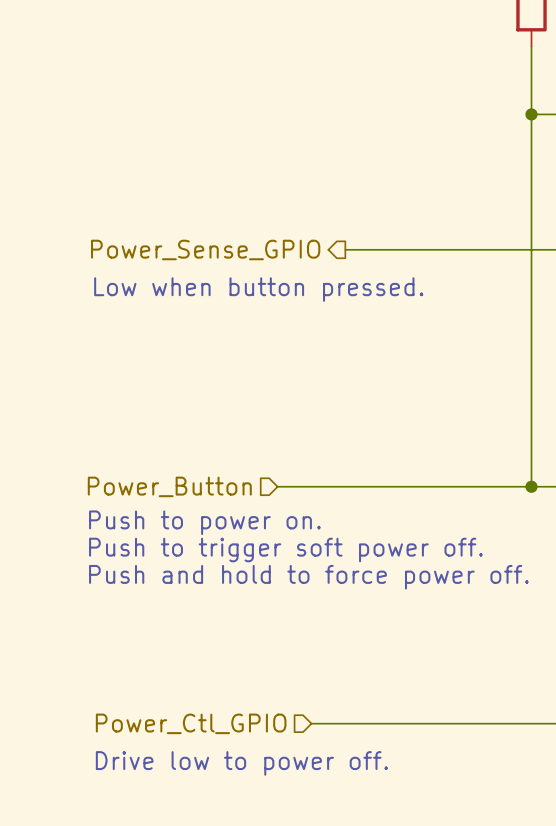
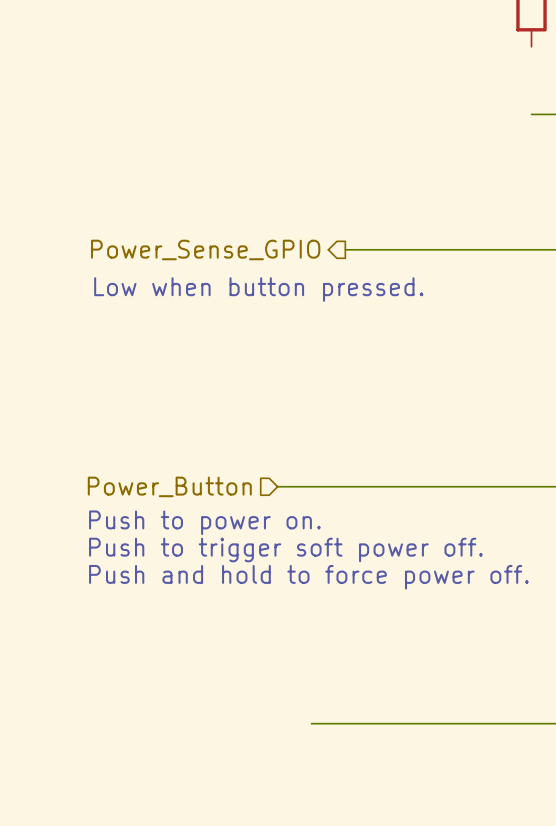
wire: (531, 46) (531, 486) -> none
junction: (531, 114) -> none
junction: (531, 486) -> none
hierarchical label: Power_Ctl_GPIO (191, 723) -> none
text: Drive low to power off. (241, 763) -> none

